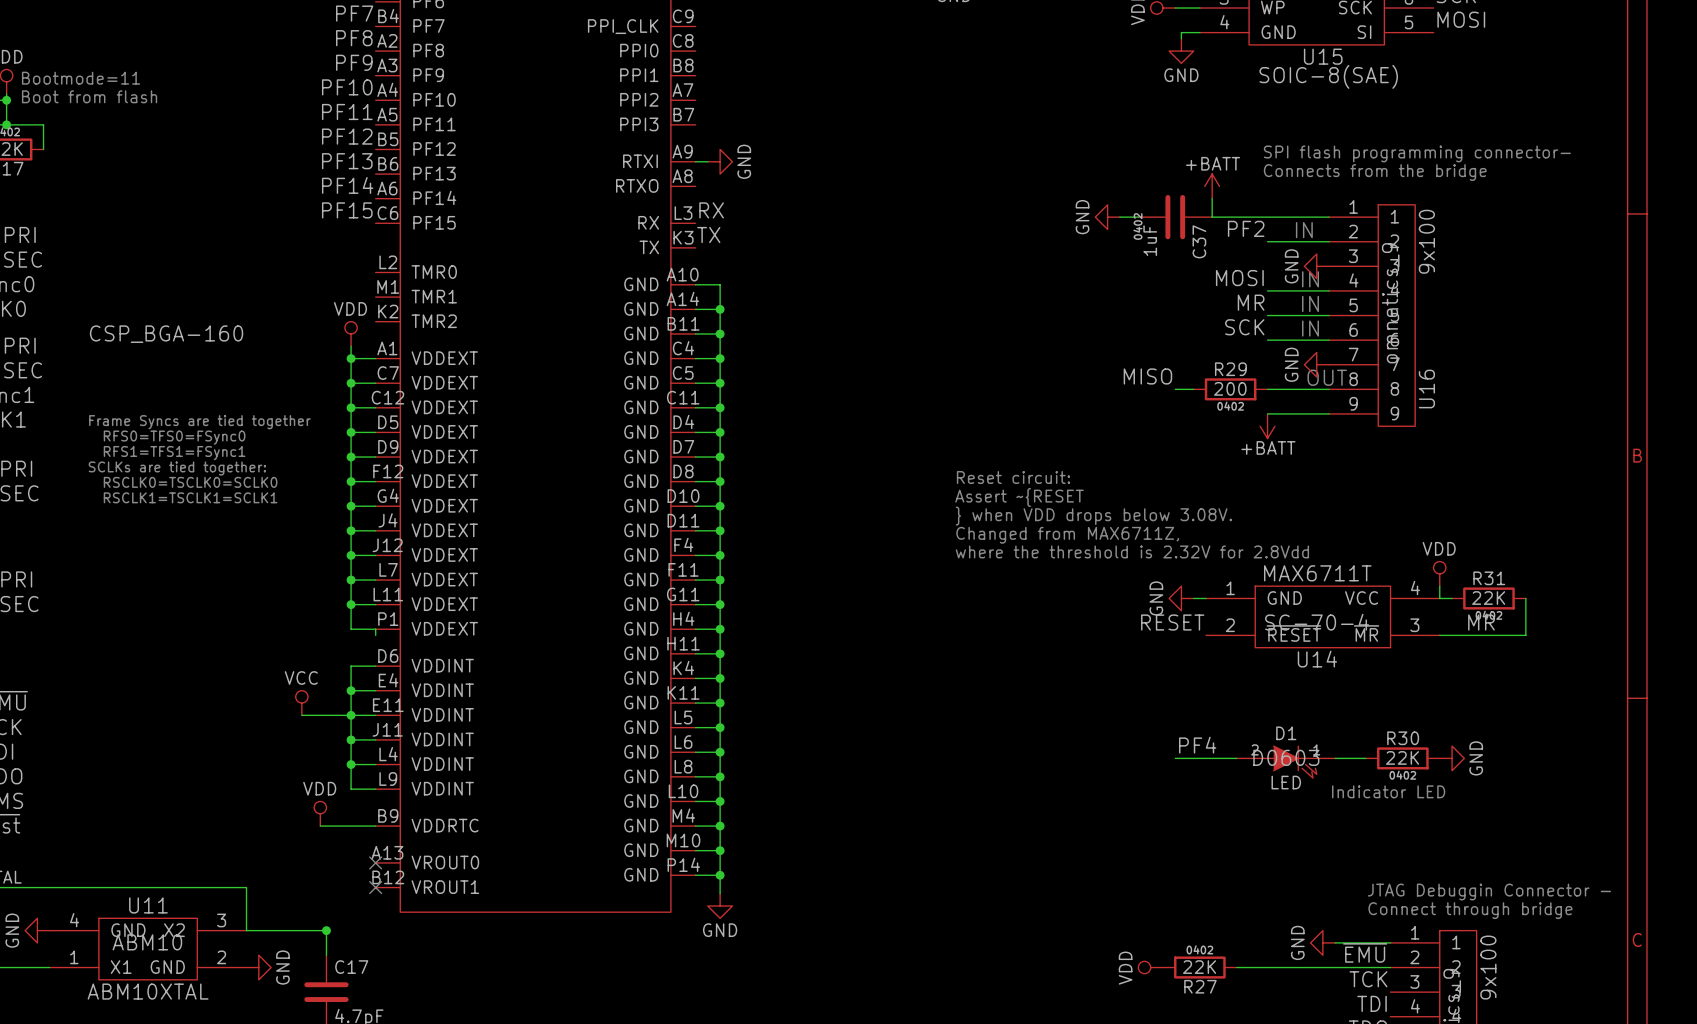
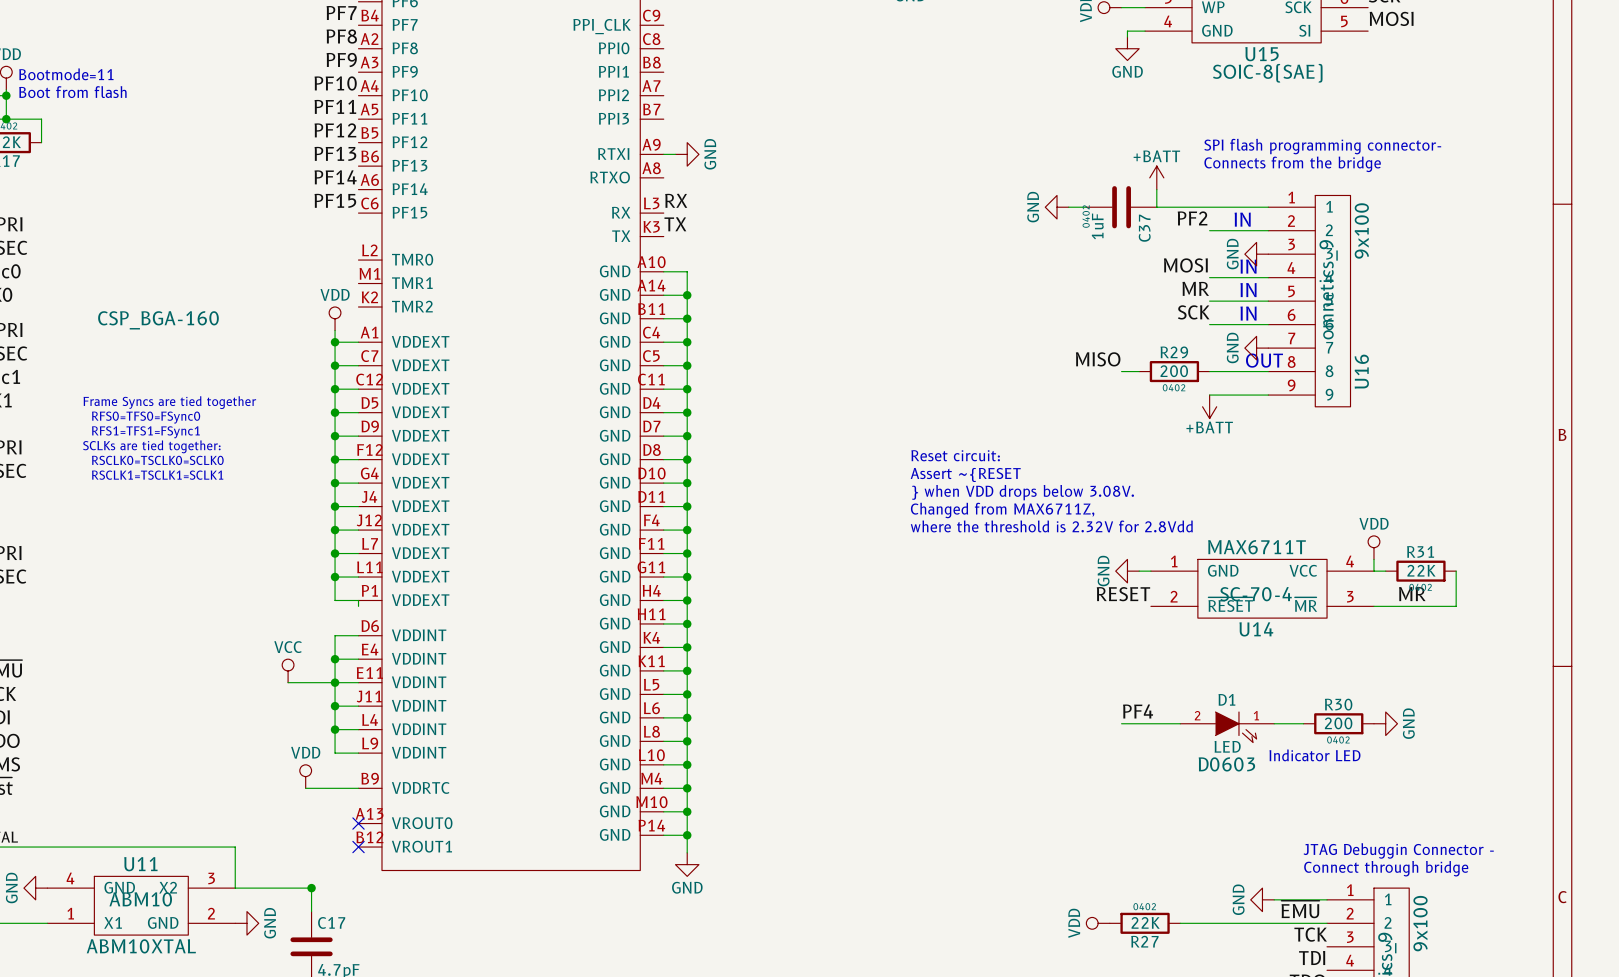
D1 text position: D0603 (1286, 757) -> D0603 (1226, 764)
R30 value: 22K (1402, 757) -> 200 (1338, 723)

